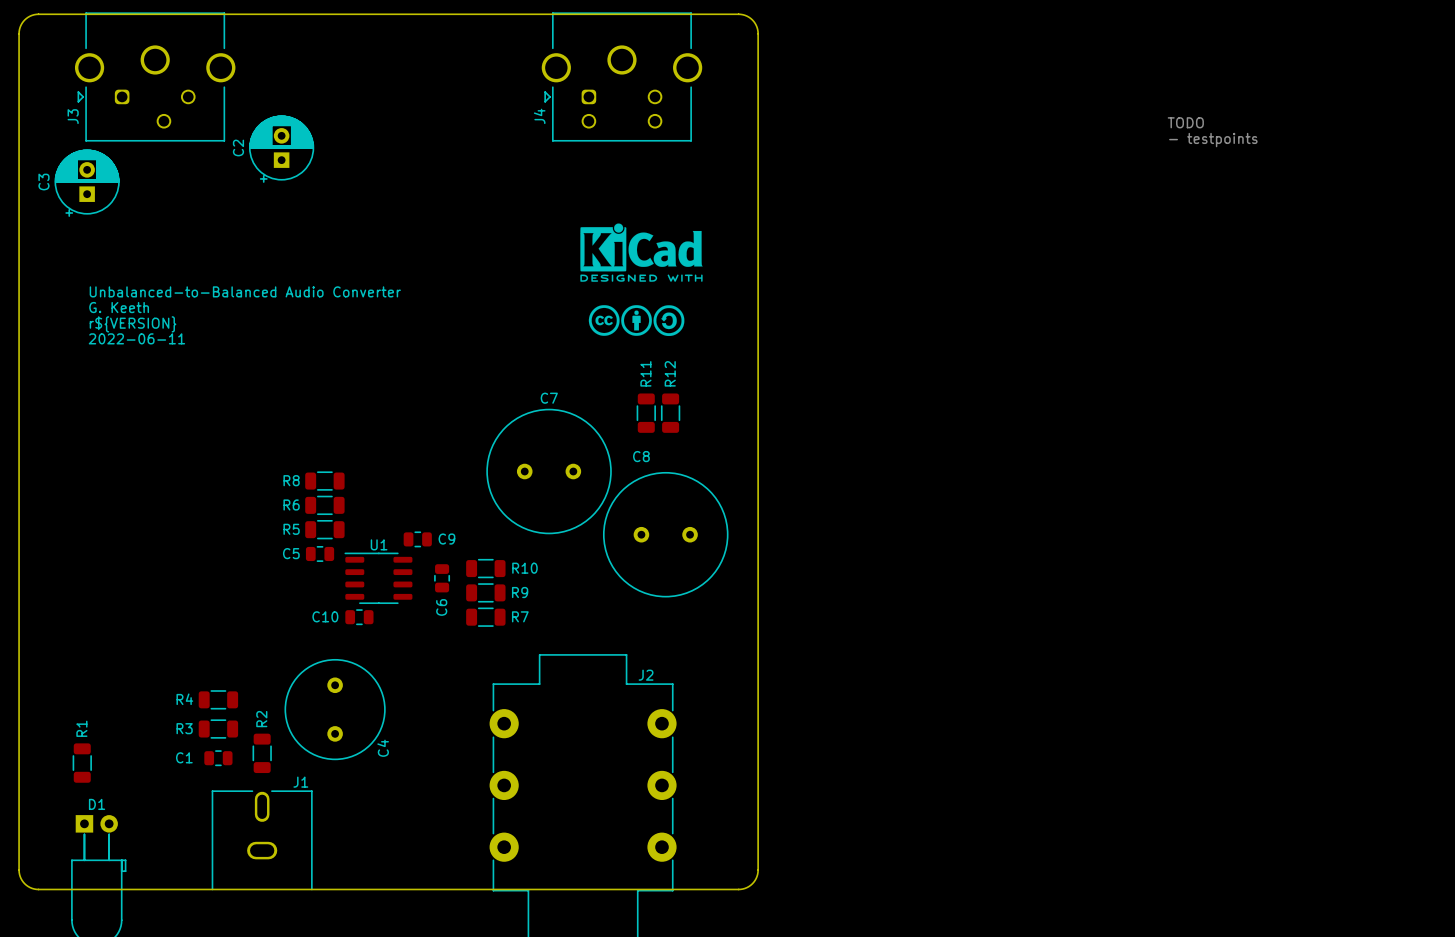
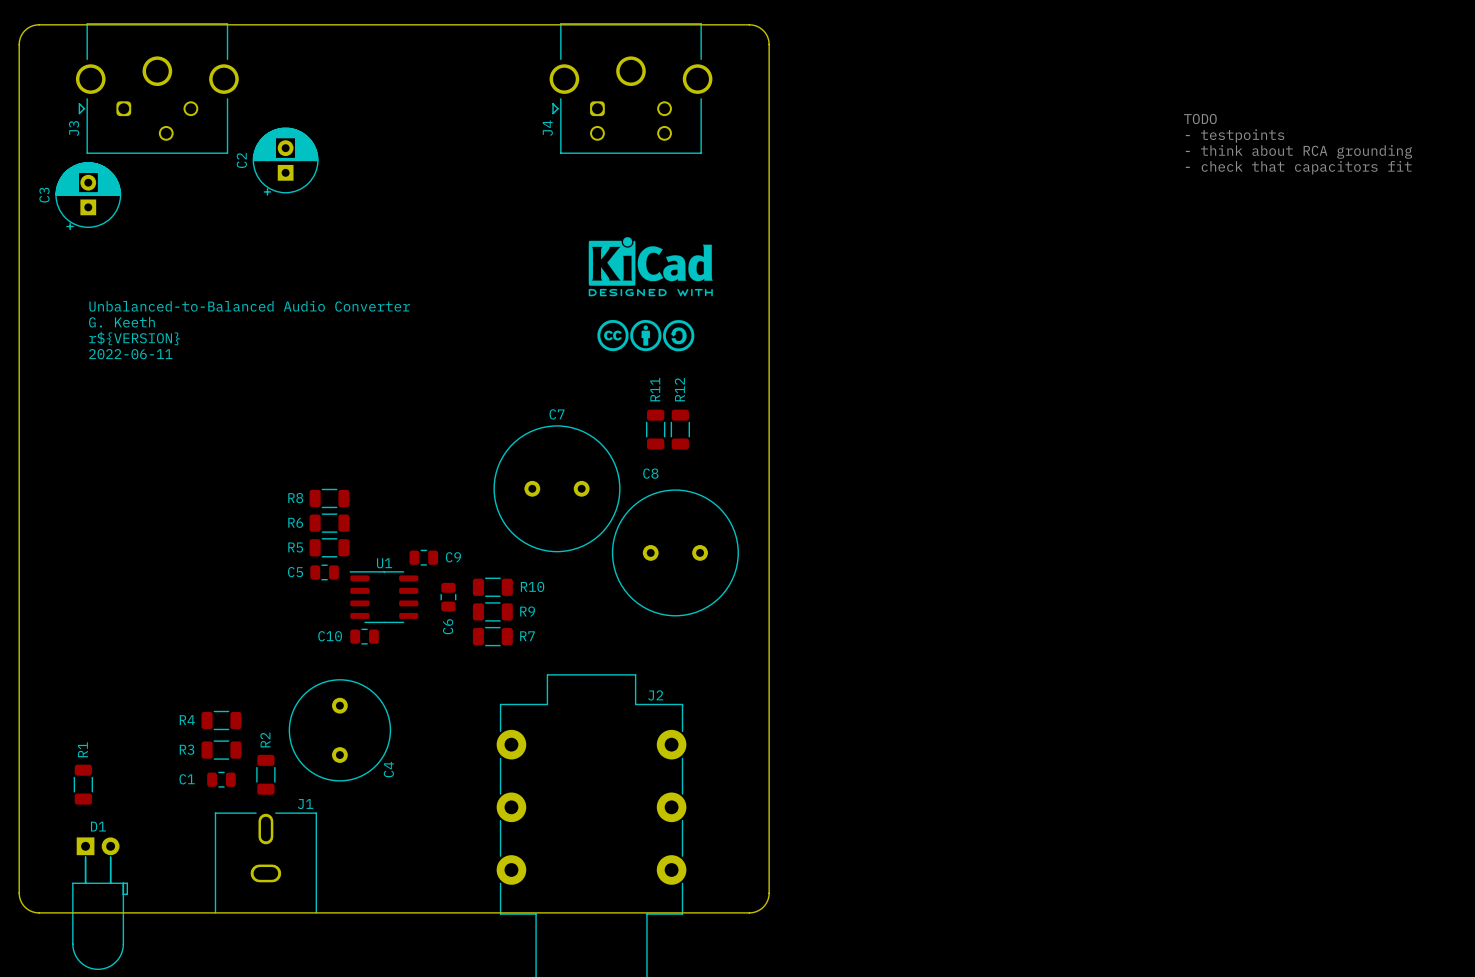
text: none -> TODO (1200, 119)
text: TODO (1185, 122) -> - testpoints (1235, 135)
text: - testpoints (1213, 140) -> - think about RCA grounding (1298, 151)
text: none -> - check that capacitors fit (1298, 167)

